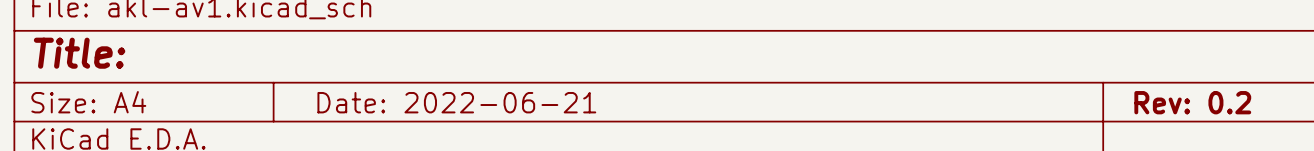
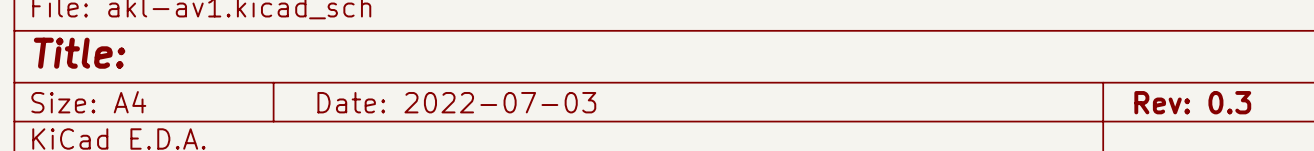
title block: Date: 2022-06-21 (456, 102) -> Date: 2022-07-03 (456, 102)
title block: Rev: 0.2 (1192, 102) -> Rev: 0.3 (1192, 102)

